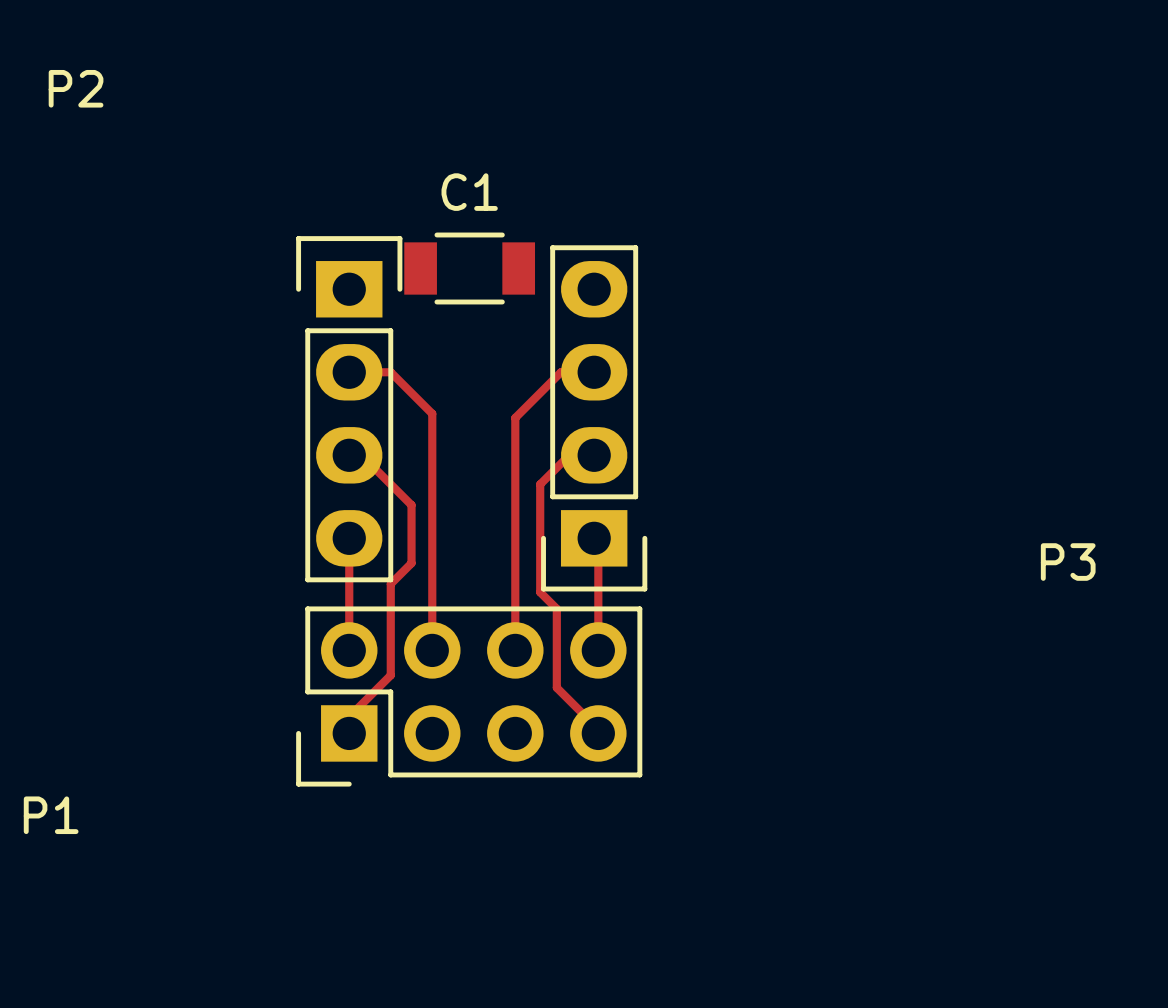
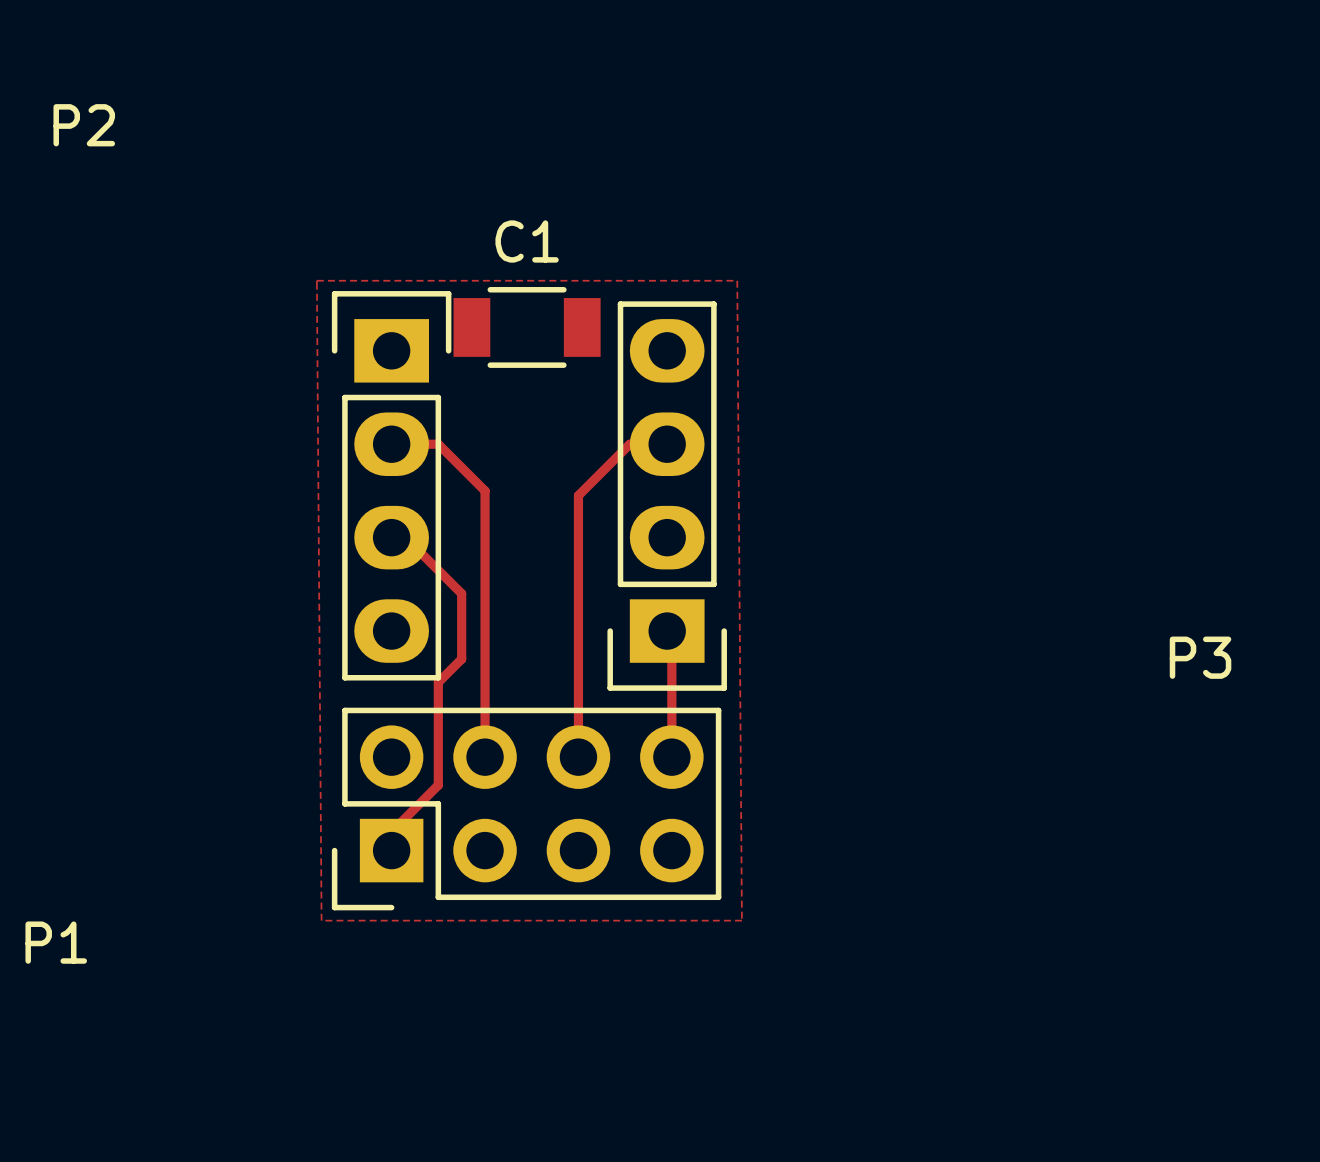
zone outline: none -> (316, 280) (737, 280) (741, 920) (321, 920) (316, 280)
track: (594, 455) (569, 455) (540, 484) (540, 592) (556, 608) (556, 687) (598, 729) (598, 733) -> none
track: (349, 538) (349, 650) -> none

